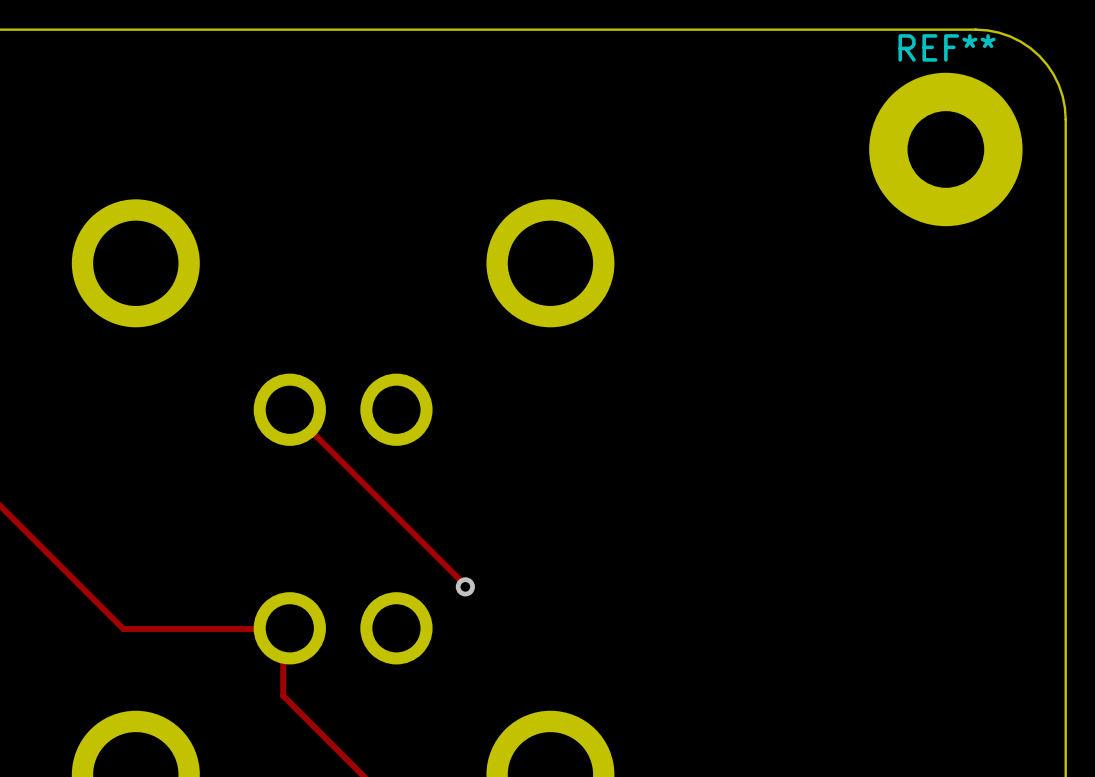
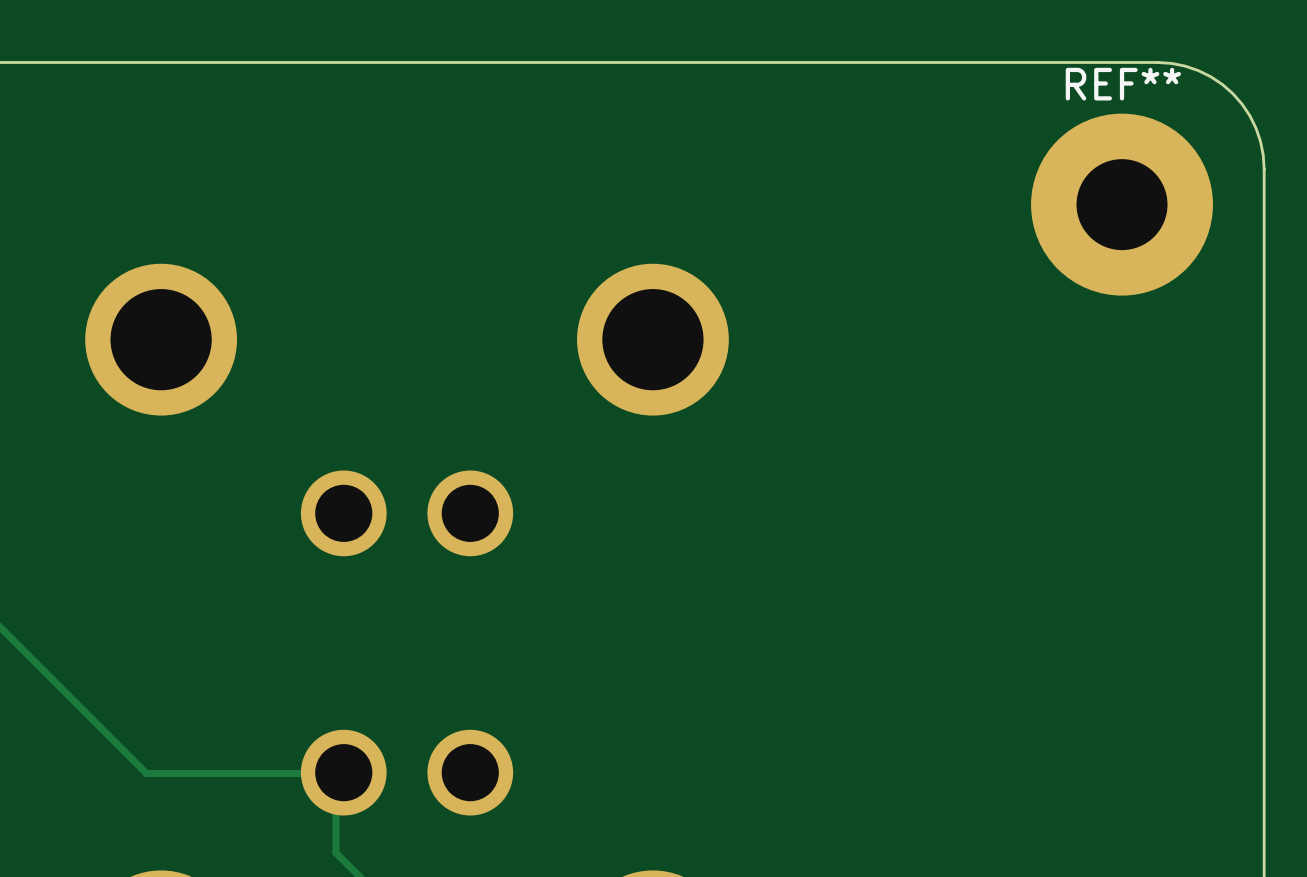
track: (289, 409) (465, 586) -> none
via: (465, 586) -> none

